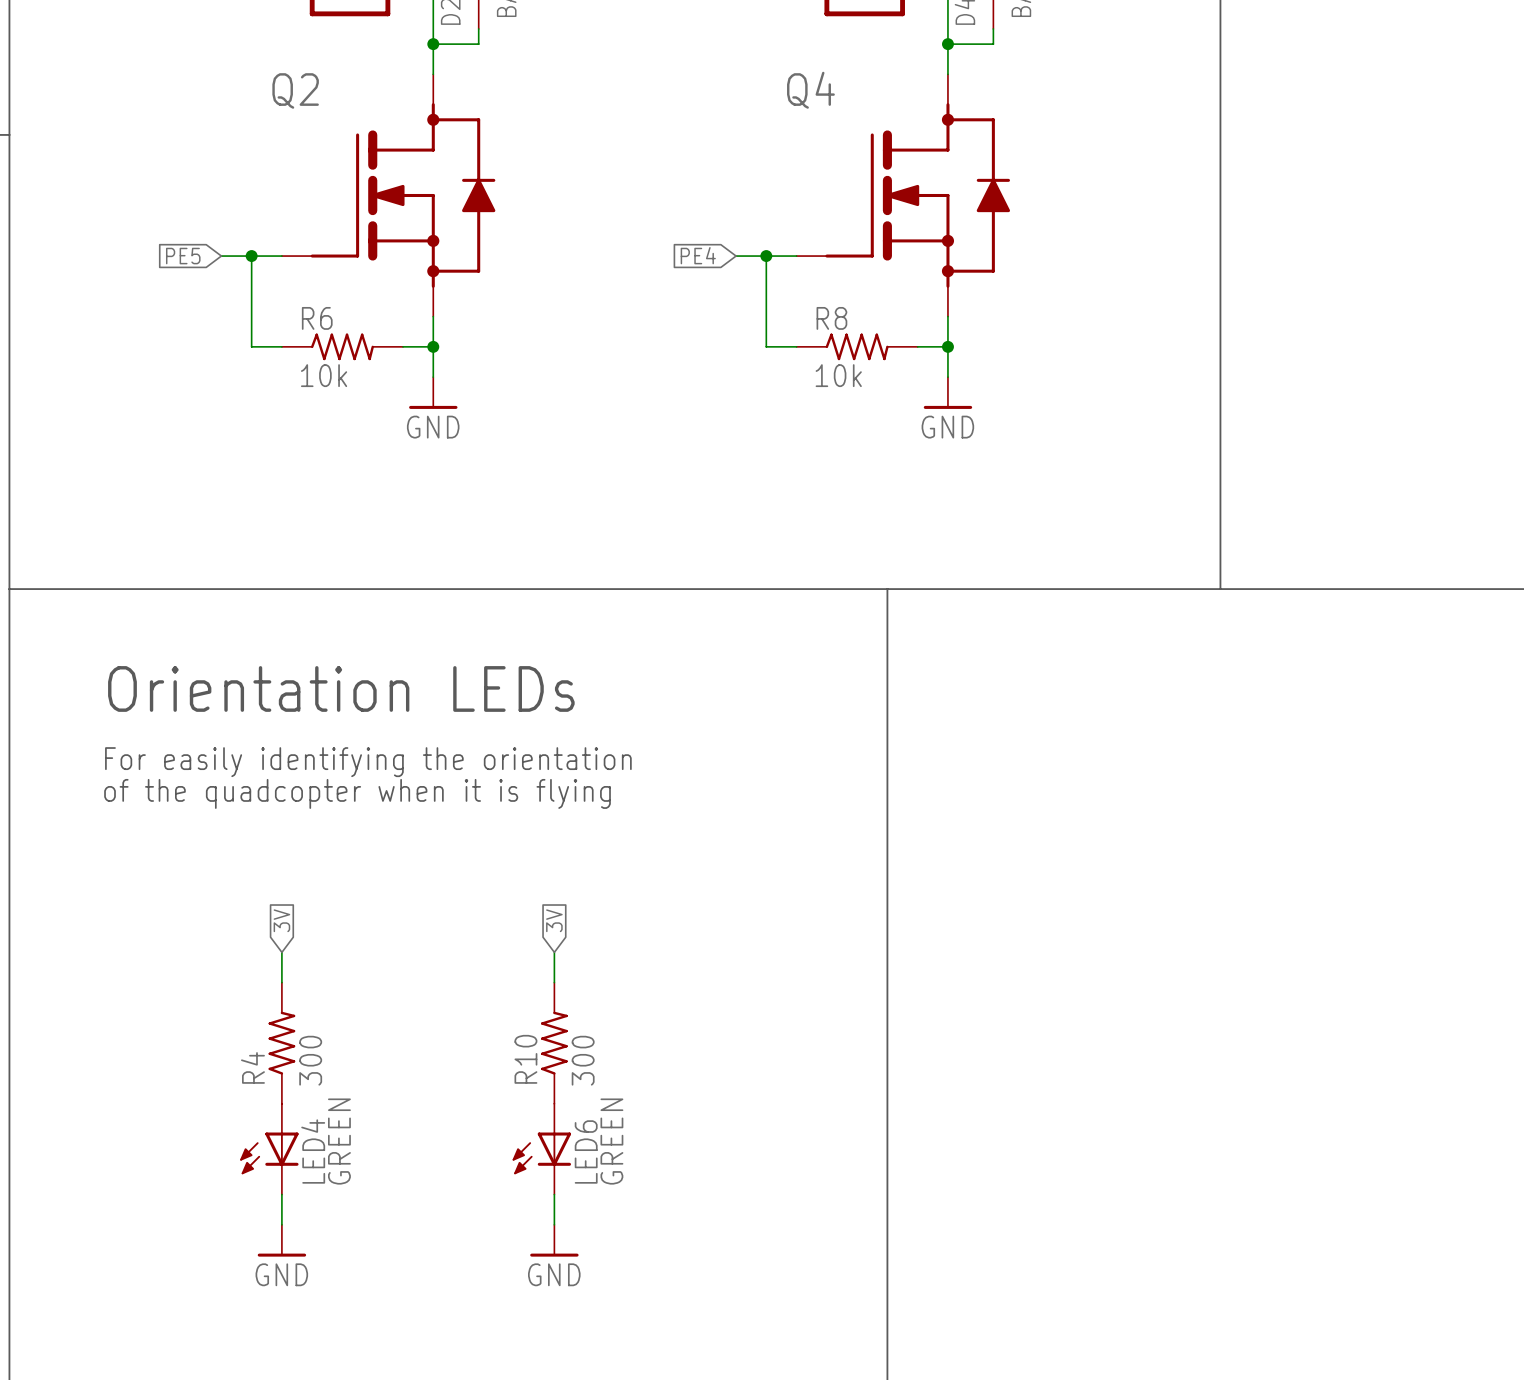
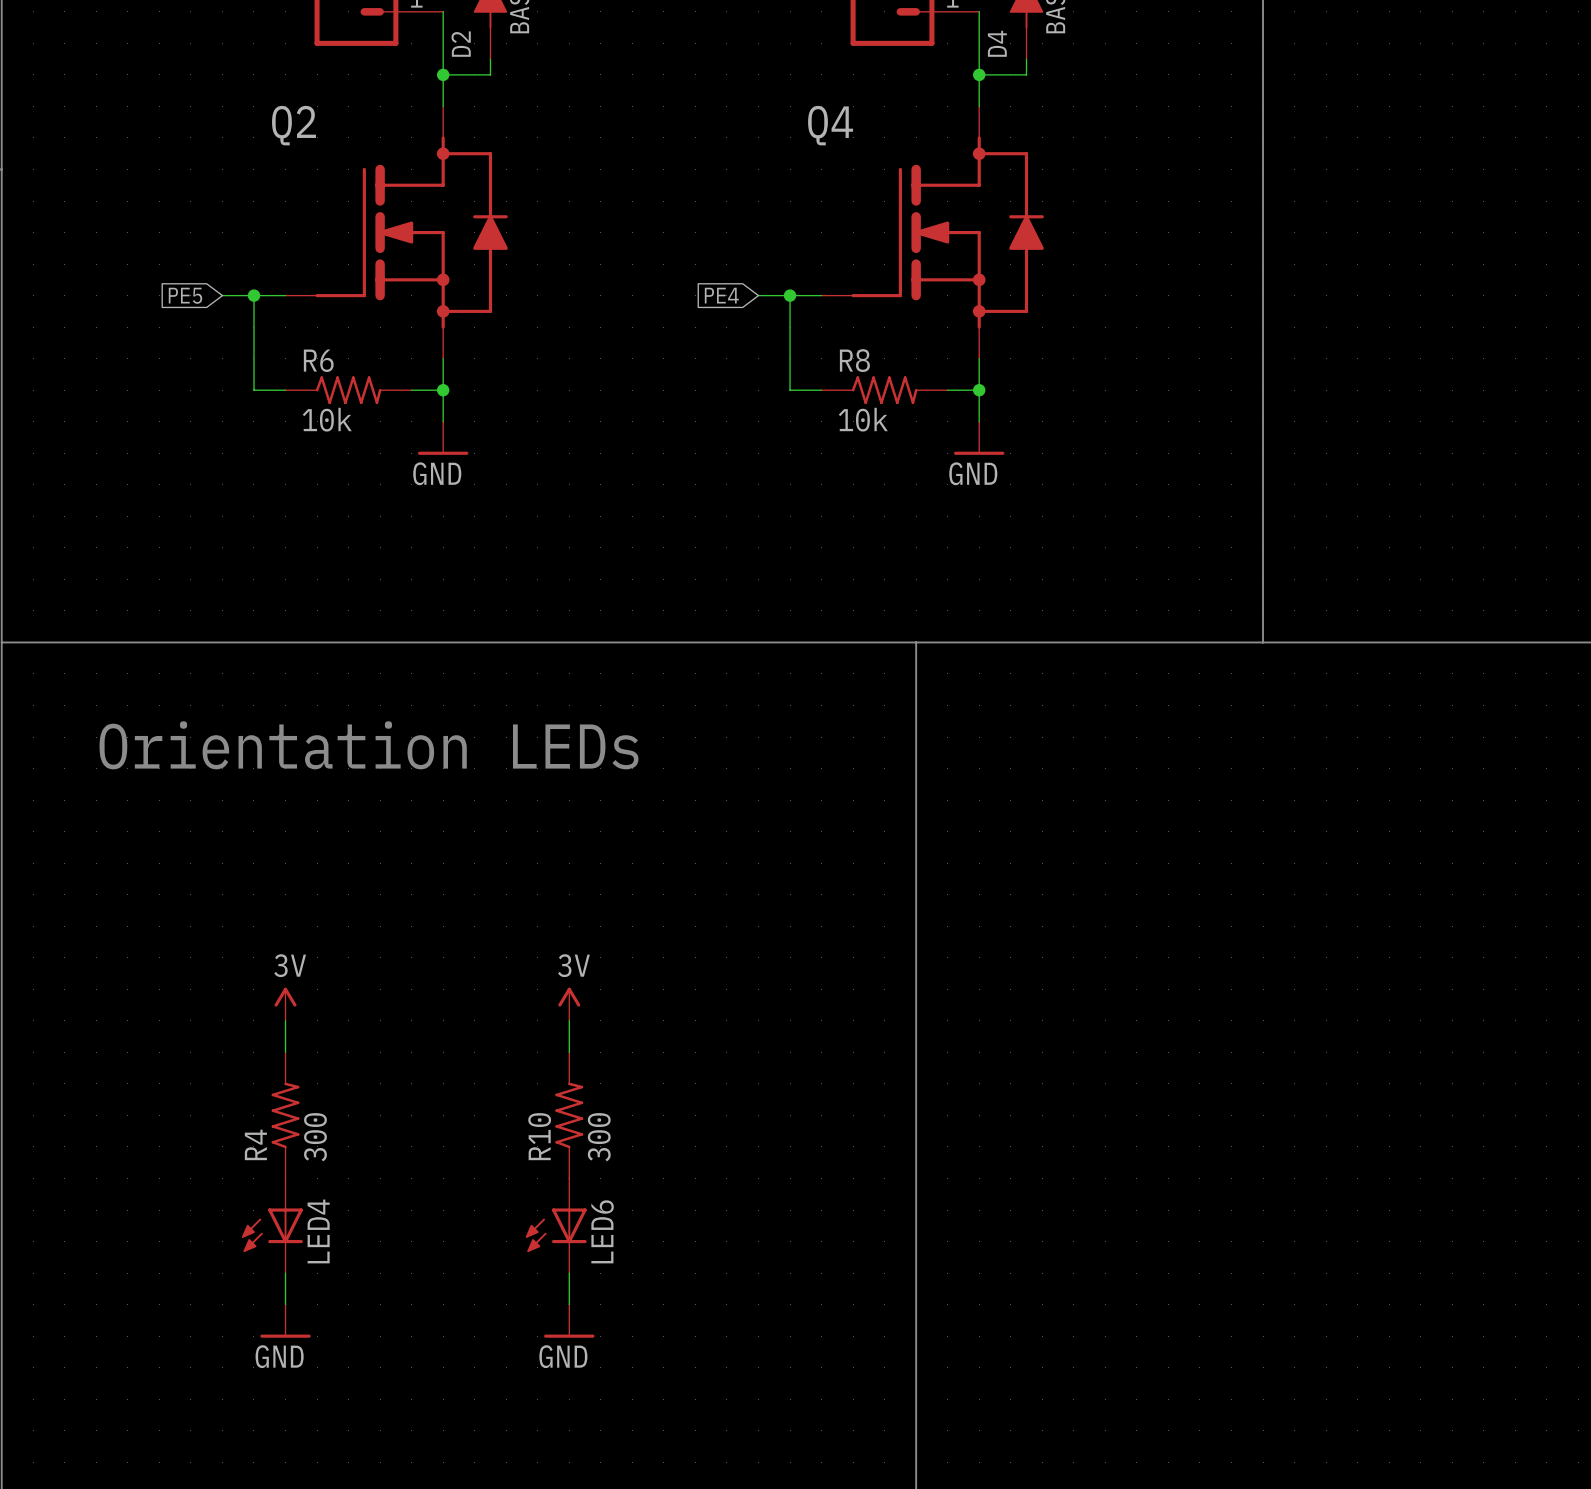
text: For easily identifying the orientation (368, 762) -> none
text: of the quadcopter when it is flying (357, 793) -> none
global label: 3V (281, 920) -> none
global label: 3V (554, 920) -> none
power symbol: none -> 3V (285, 1004)
power symbol: none -> 3V (569, 1004)
LED4 value: GREEN (339, 1141) -> none
LED6 value: GREEN (611, 1141) -> none

